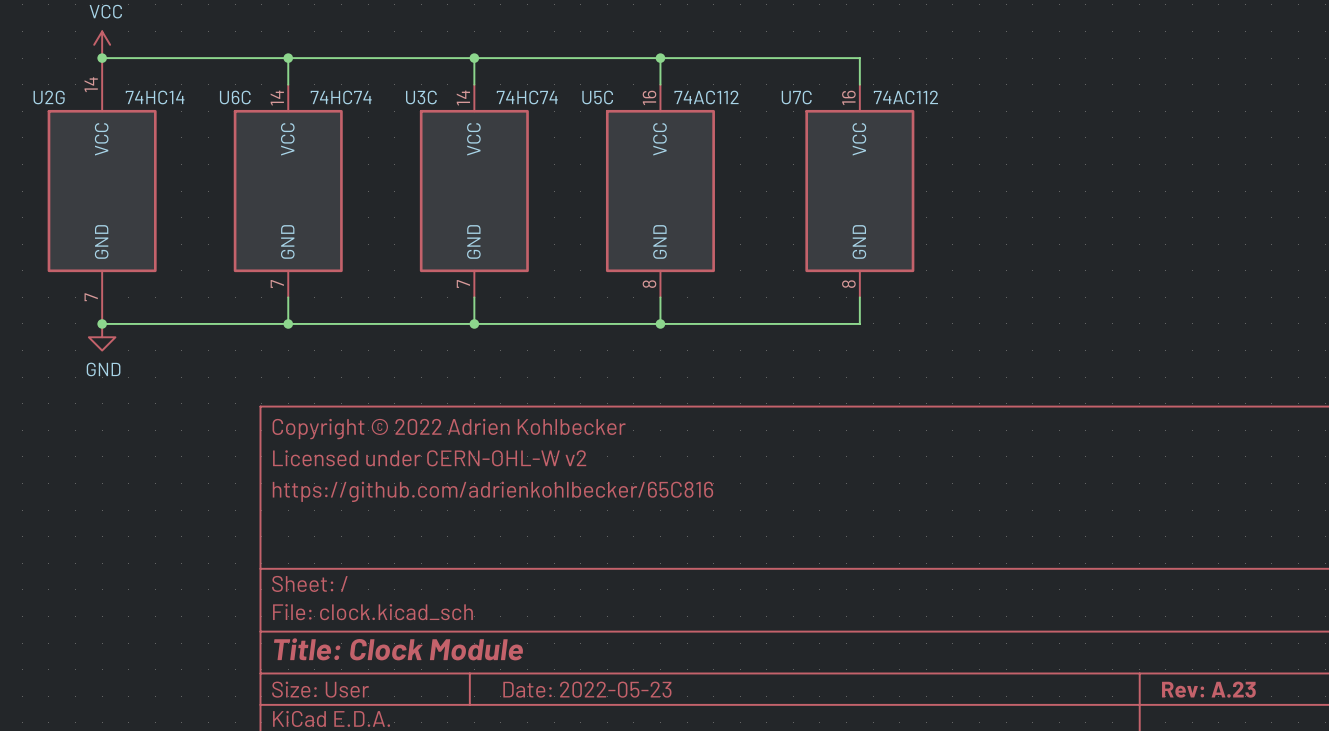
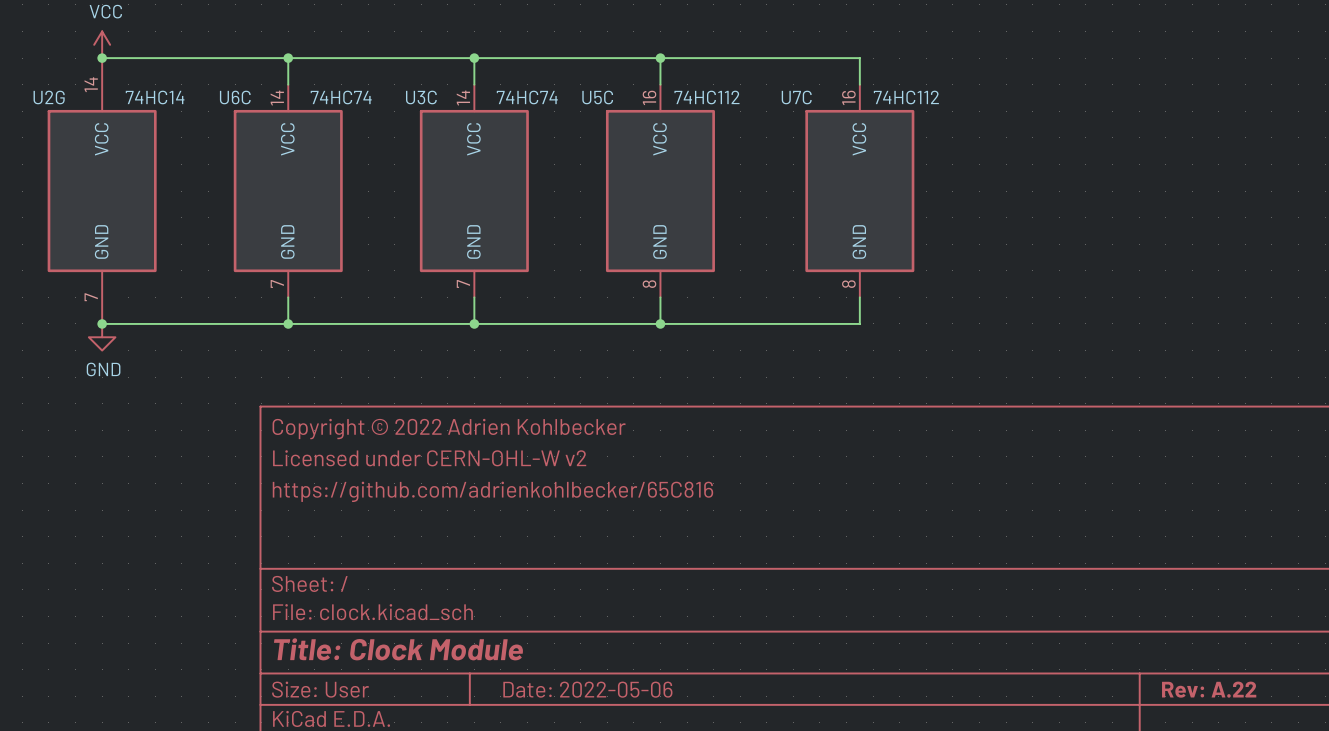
U5C value: 74AC112 (706, 97) -> 74HC112 (706, 97)
U7C value: 74AC112 (905, 97) -> 74HC112 (906, 97)
title block: Date: 2022-05-23 (587, 689) -> Date: 2022-05-06 (587, 689)
title block: Rev: A.23 (1208, 689) -> Rev: A.22 (1209, 689)

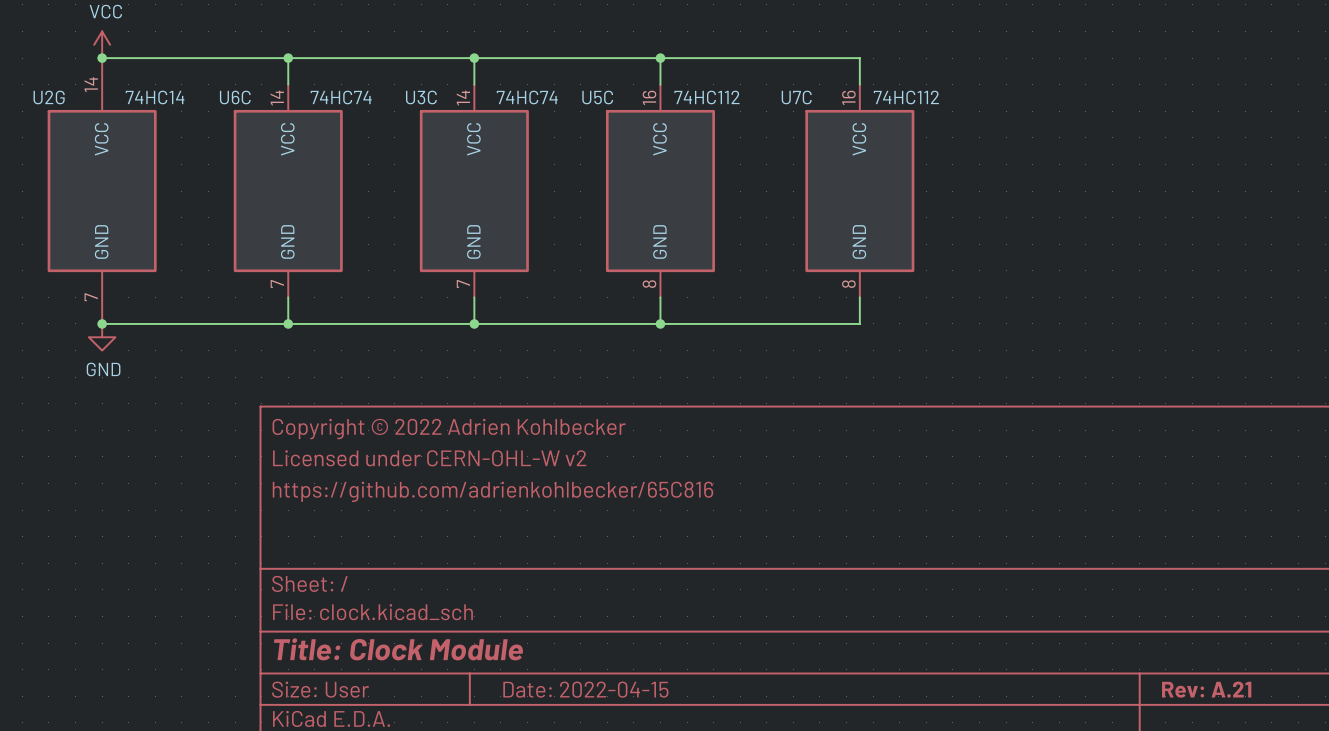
title block: Date: 2022-05-06 (587, 689) -> Date: 2022-04-15 (585, 689)
title block: Rev: A.22 (1209, 689) -> Rev: A.21 (1206, 689)

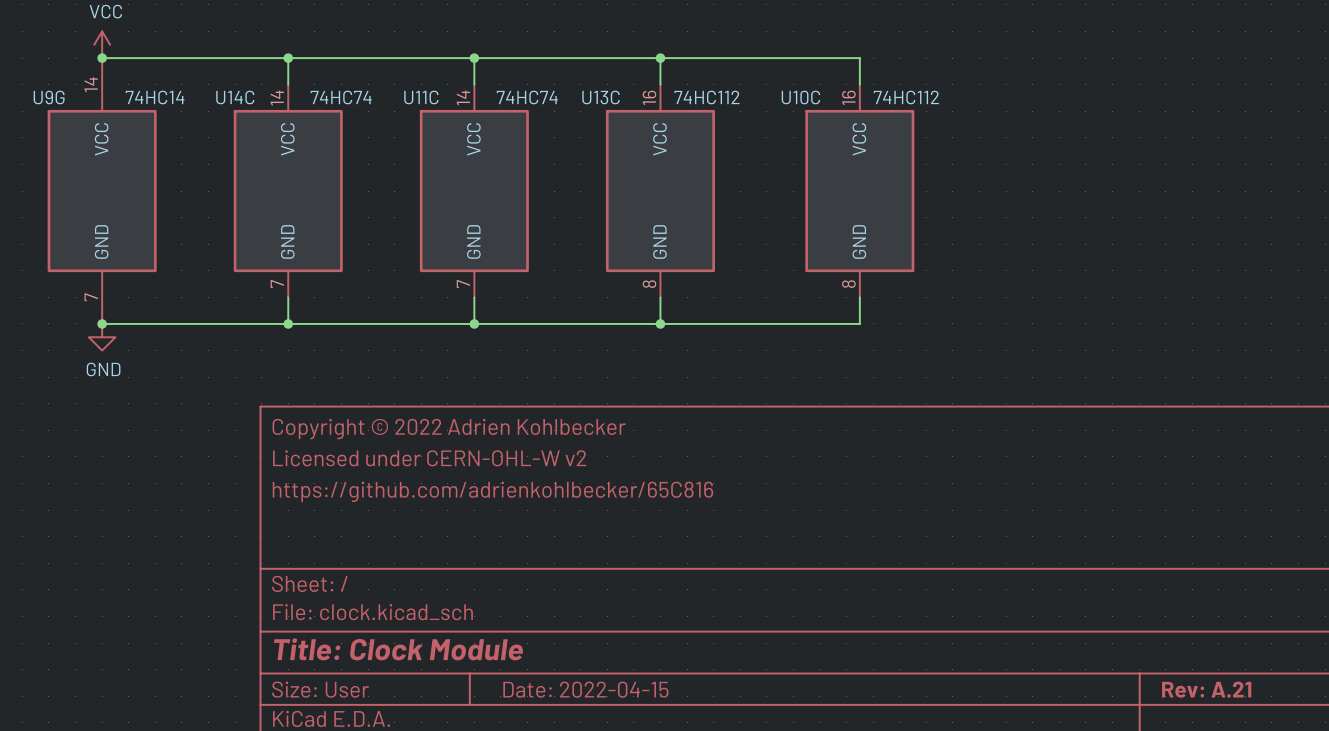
U2G name: U2G (49, 97) -> U9G (49, 97)
U6C name: U6C (235, 97) -> U14C (235, 97)
U3C name: U3C (421, 97) -> U11C (421, 97)
U5C name: U5C (597, 97) -> U13C (601, 97)
U7C name: U7C (796, 97) -> U10C (800, 97)

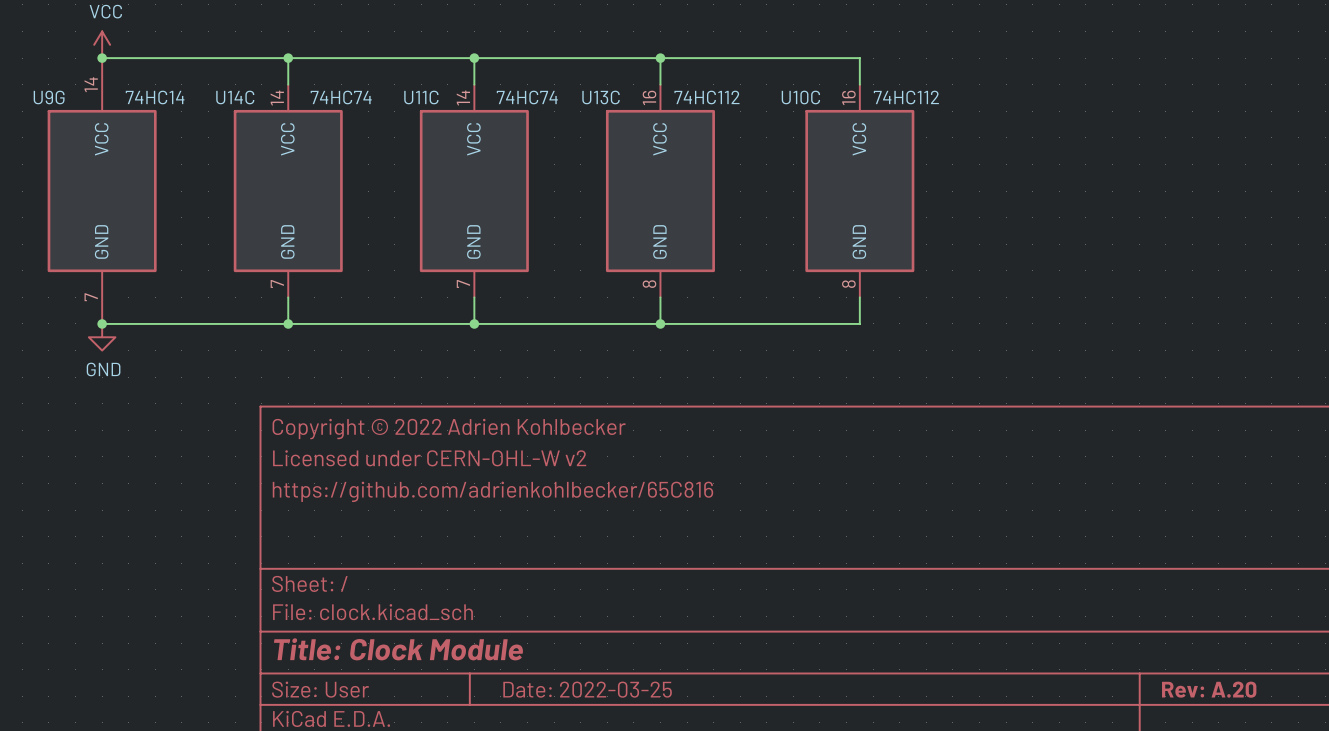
title block: Date: 2022-04-15 (585, 689) -> Date: 2022-03-25 (587, 689)
title block: Rev: A.21 (1206, 689) -> Rev: A.20 (1209, 689)

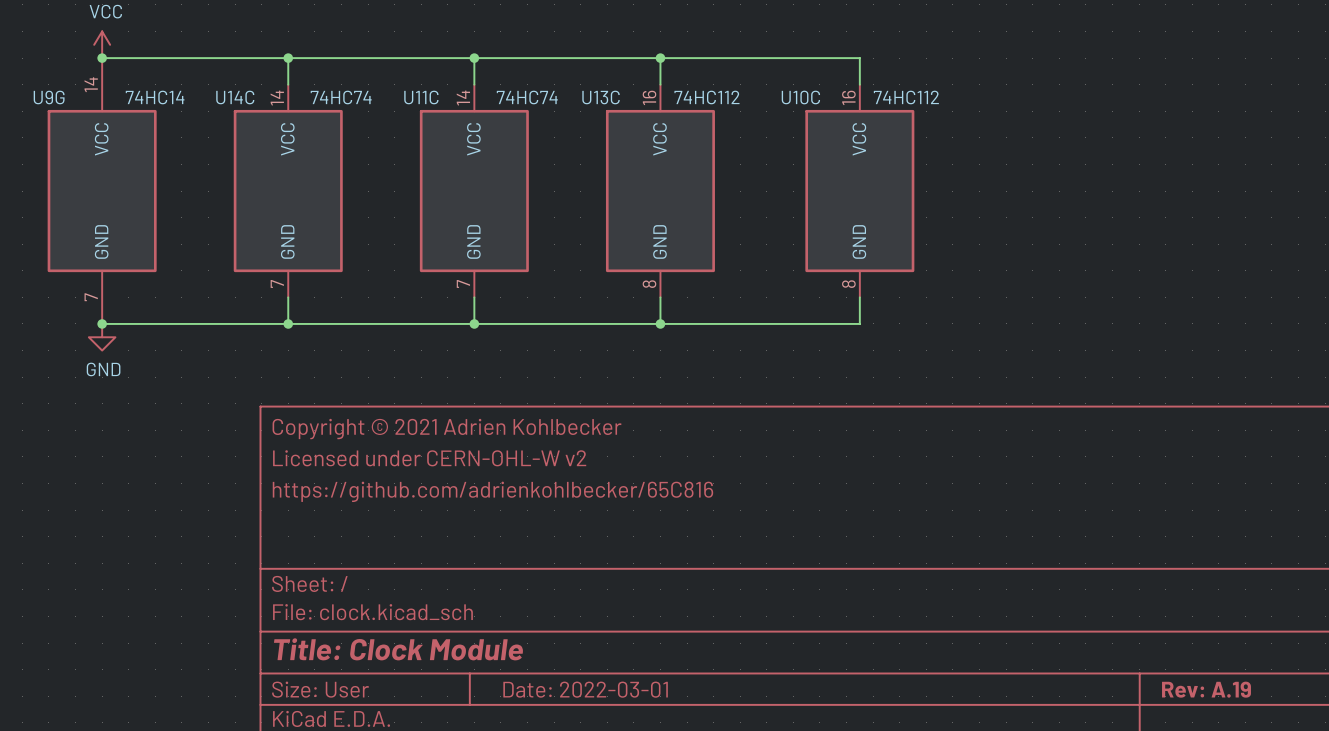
title block: Copyright © 2022 Adrien Kohlbecker (449, 429) -> Copyright © 2021 Adrien Kohlbecker (447, 429)
title block: Date: 2022-03-25 (587, 689) -> Date: 2022-03-01 (585, 689)
title block: Rev: A.20 (1209, 689) -> Rev: A.19 (1206, 689)

